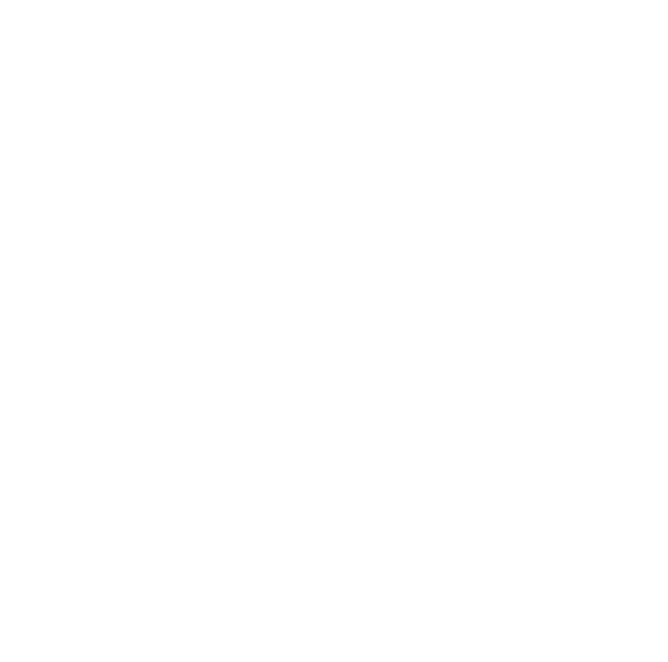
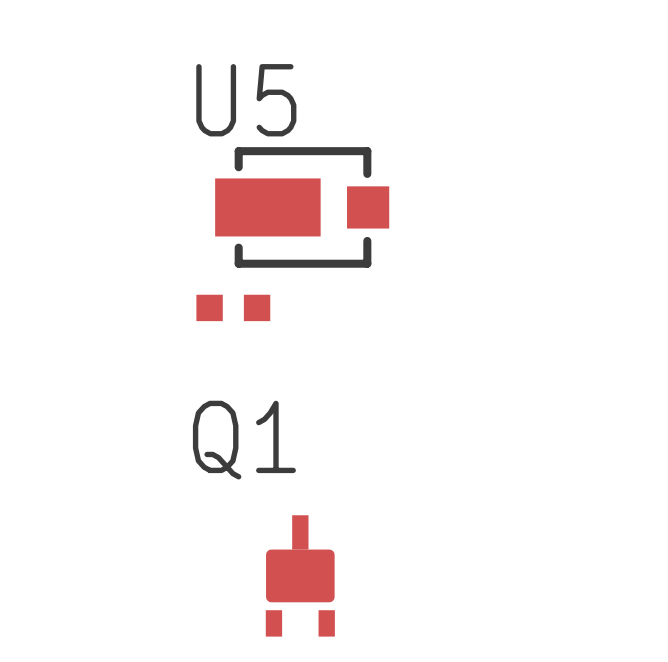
U5: none -> (302, 207)
part: none -> (233, 307)
Q1: none -> (300, 575)

